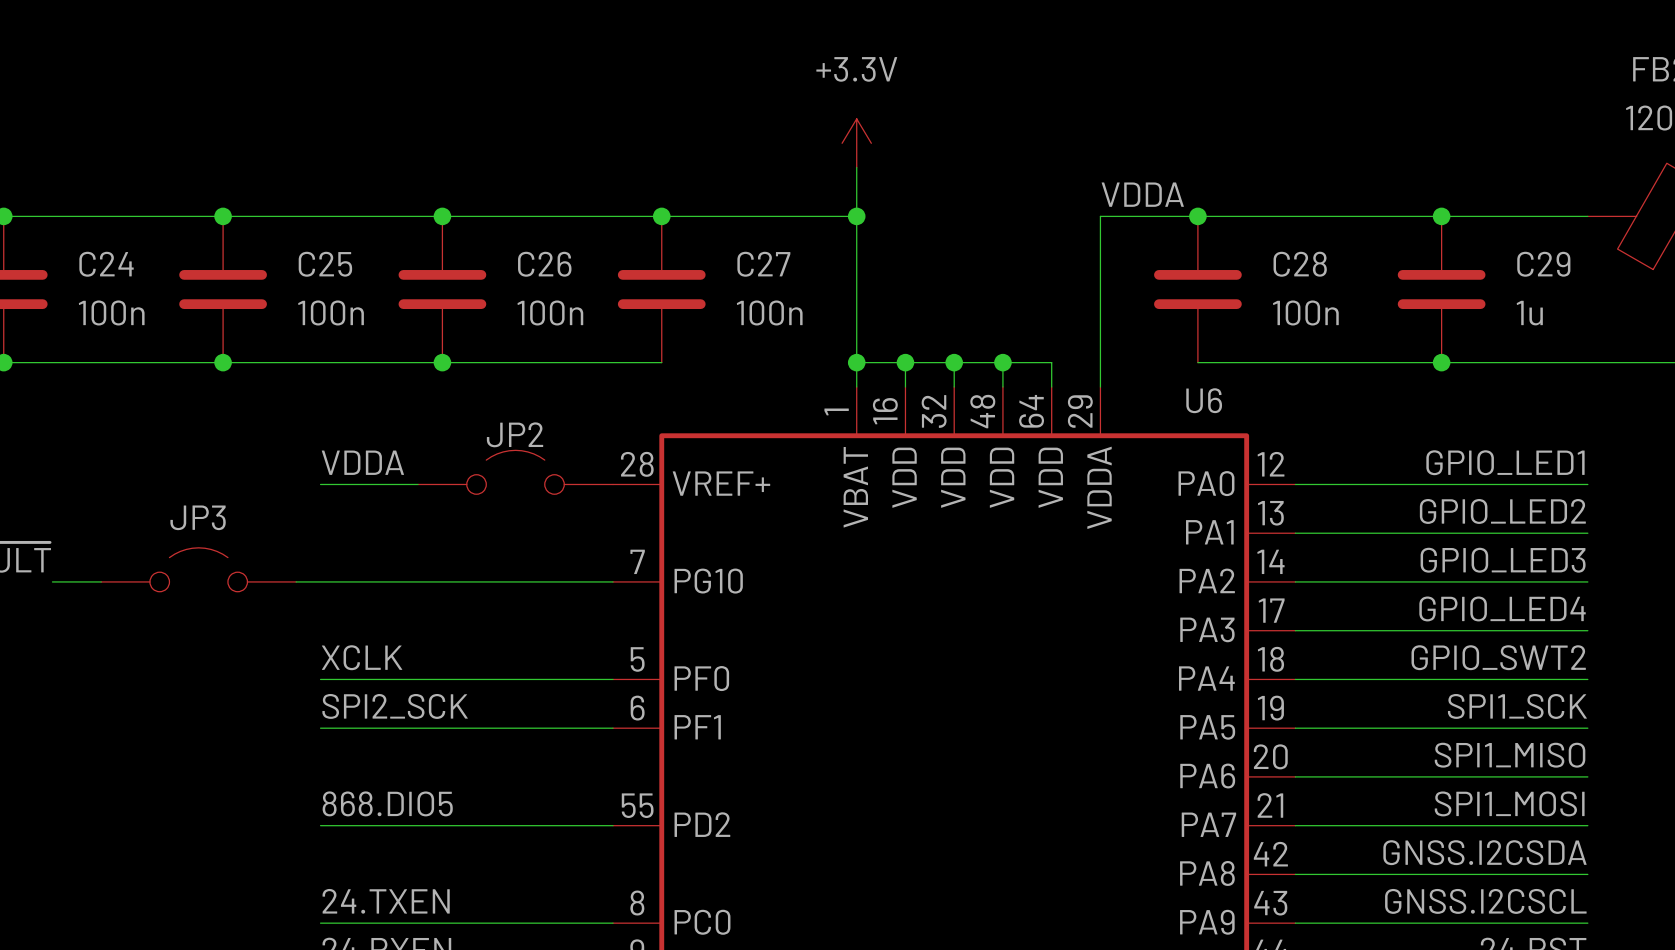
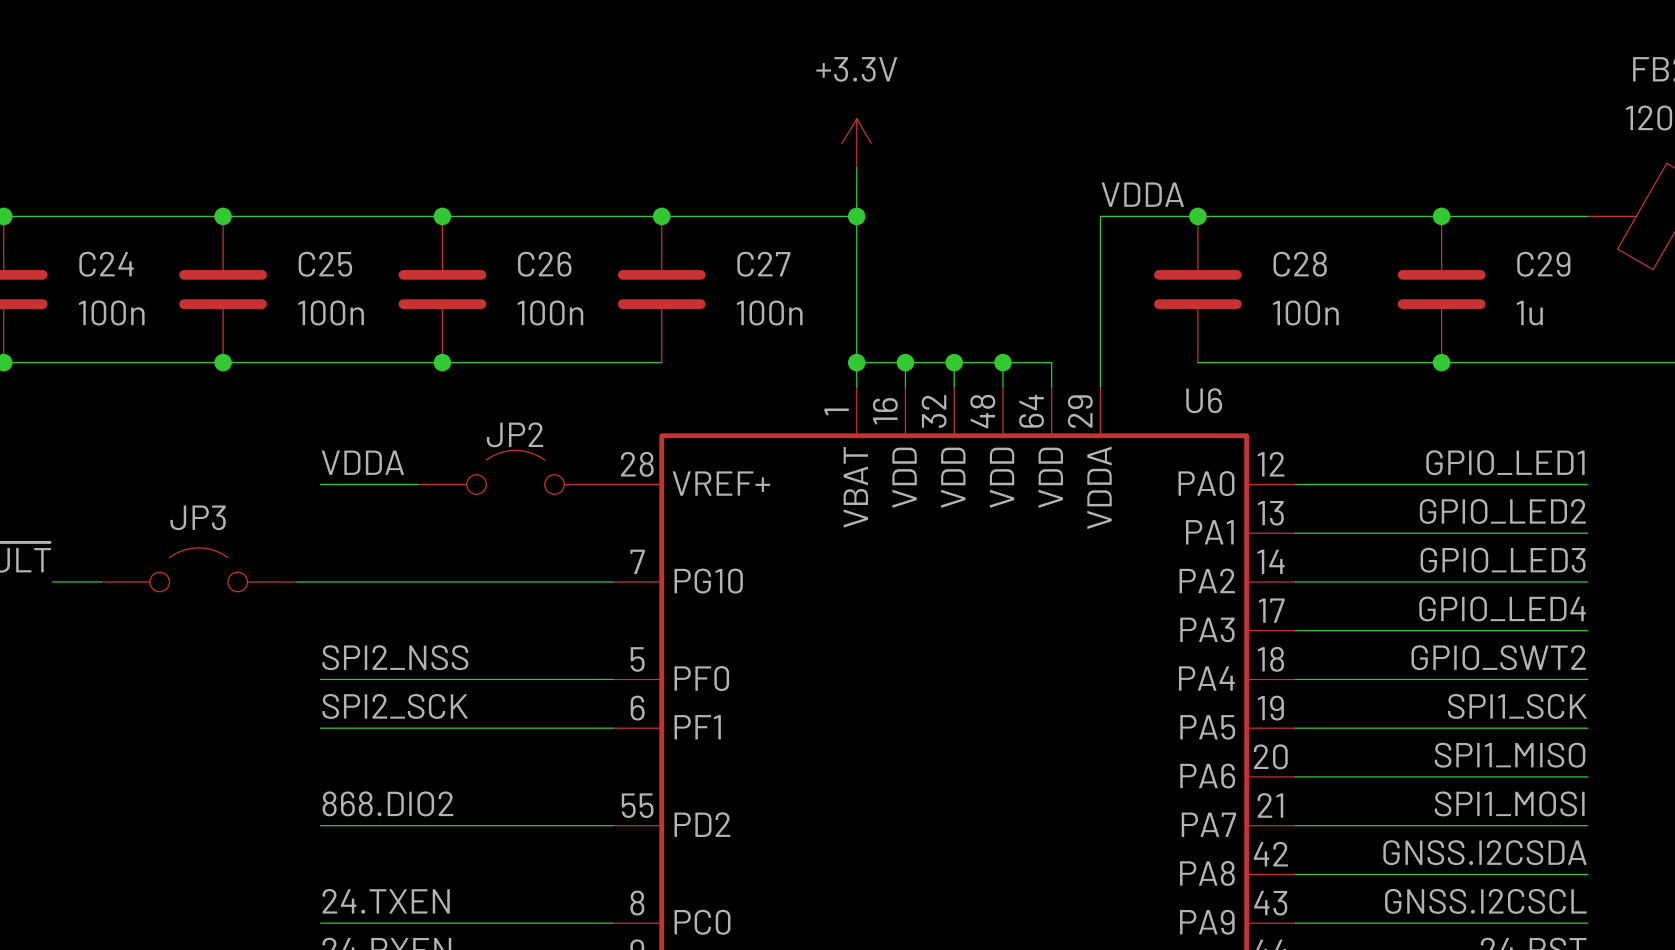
label: XCLK (362, 657) -> SPI2_NSS (395, 657)
label: 868.DIO5 (387, 803) -> 868.DIO2 (387, 803)

